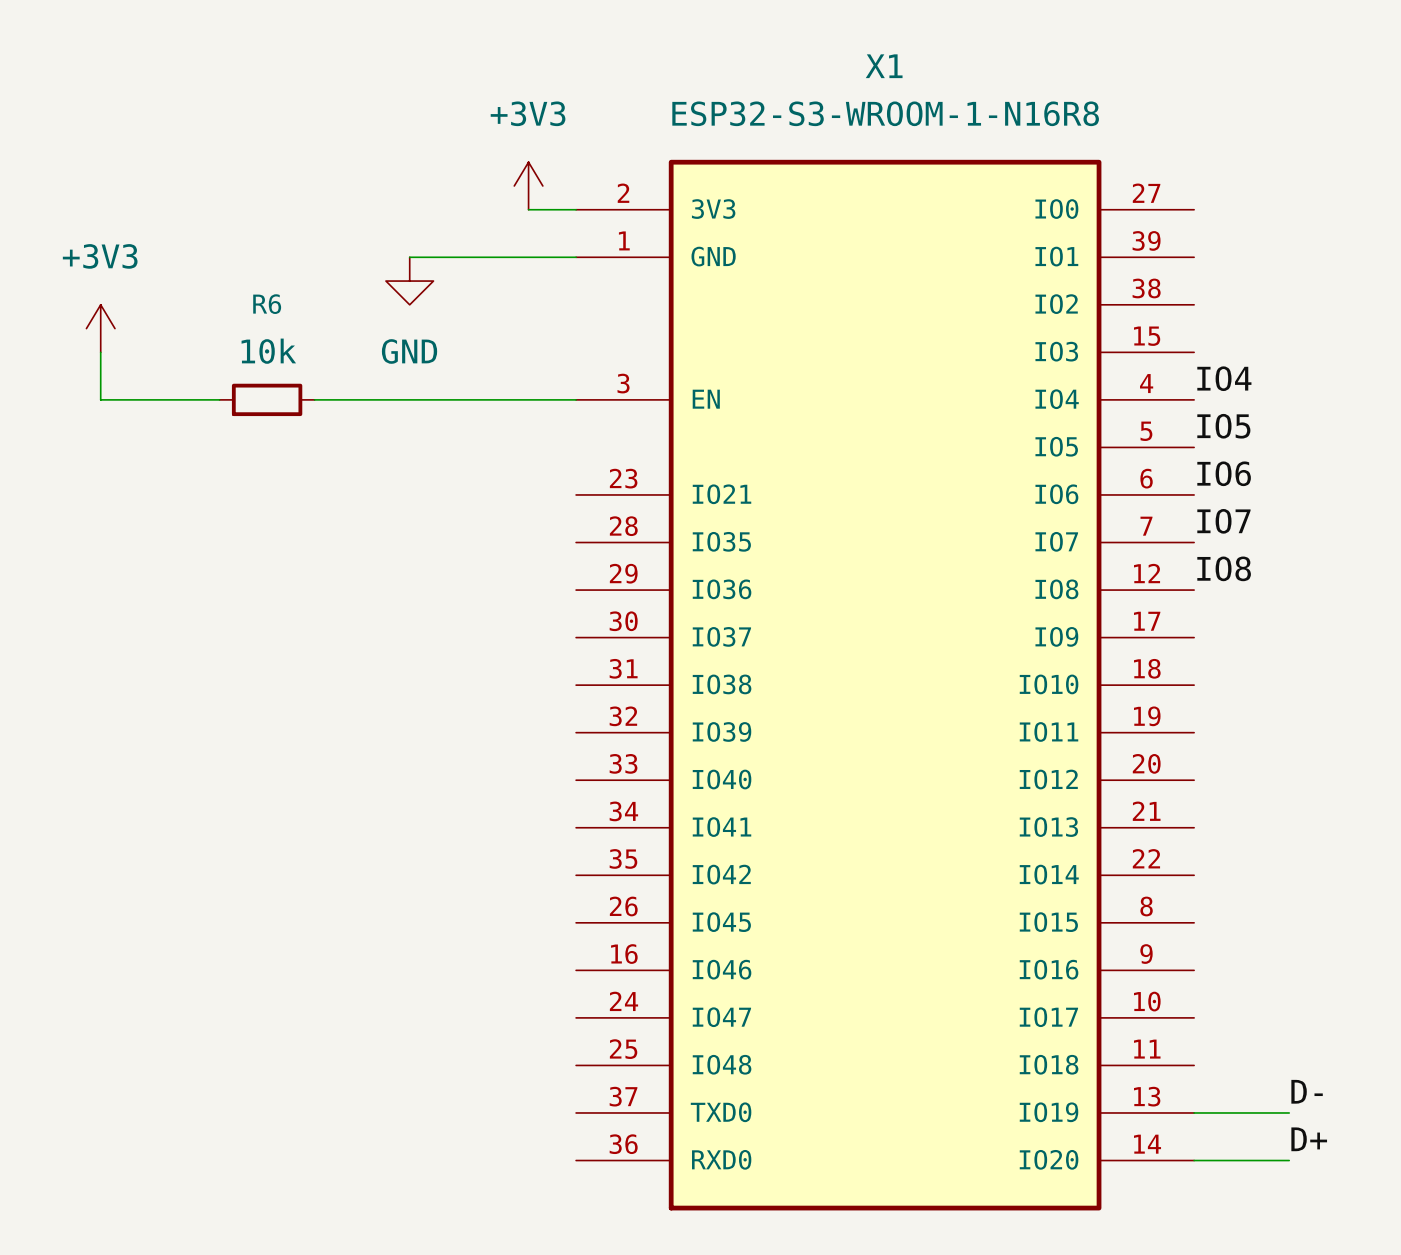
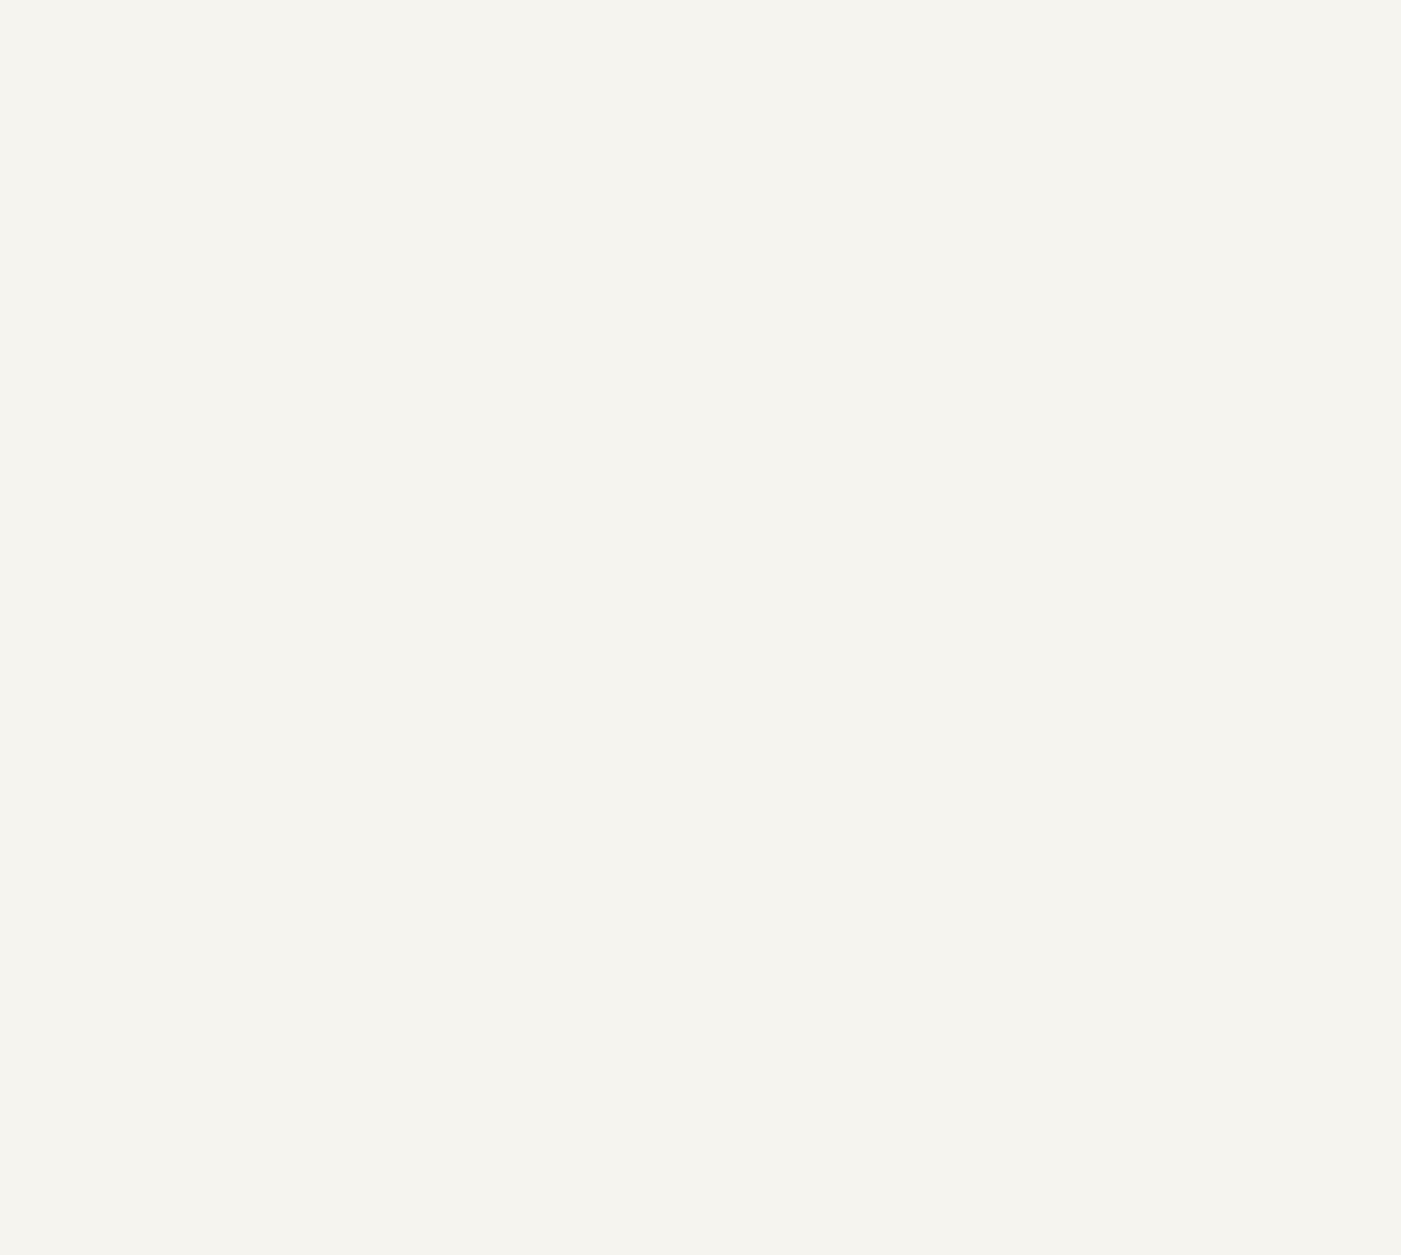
power symbol: +3V3 (528, 185) -> none
wire: (528, 209) (576, 209) -> none
wire: (409, 257) (576, 257) -> none
power symbol: GND (409, 281) -> none
power symbol: +3V3 (100, 328) -> none
wire: (100, 352) (100, 399) (219, 399) -> none
label: IO4 (1224, 378) -> none
R6: 10k (267, 399) -> none
wire: (314, 399) (576, 399) -> none
label: IO5 (1223, 426) -> none
label: IO6 (1224, 473) -> none
label: IO7 (1223, 521) -> none
label: IO8 (1224, 568) -> none
X1: ESP32-S3-WROOM-1-N16R8 (885, 685) -> none
label: D- (1307, 1091) -> none
wire: (1194, 1112) (1289, 1112) -> none
label: D+ (1309, 1139) -> none
wire: (1194, 1160) (1289, 1160) -> none

